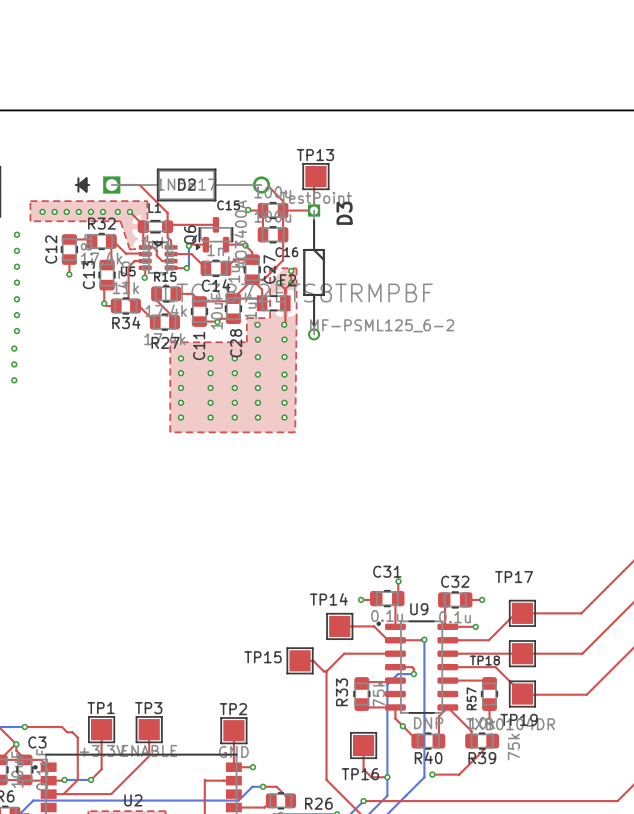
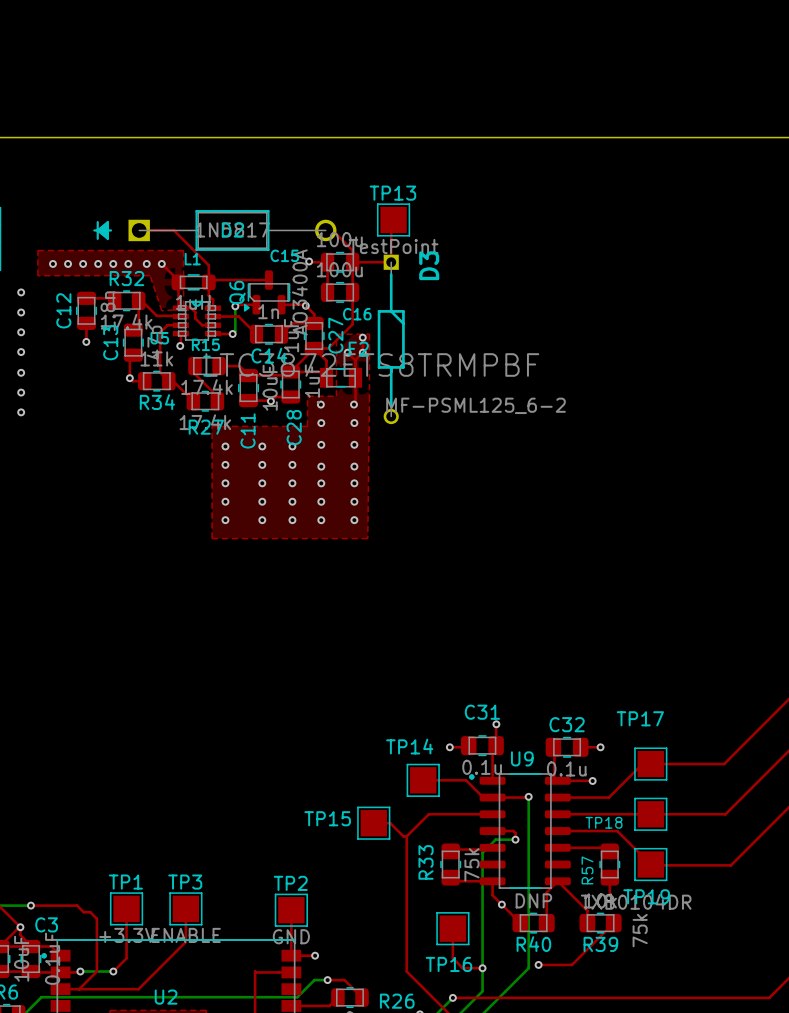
via: (14, 348) -> none
via: (14, 364) -> none
via: (14, 380) -> none

